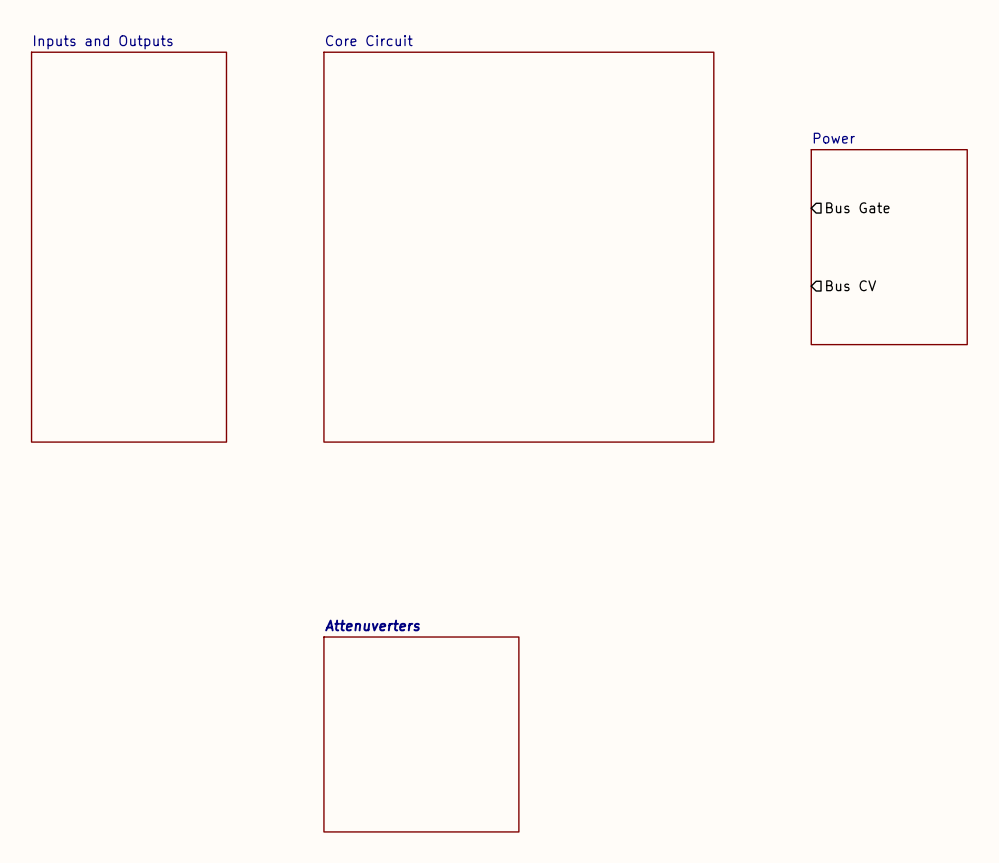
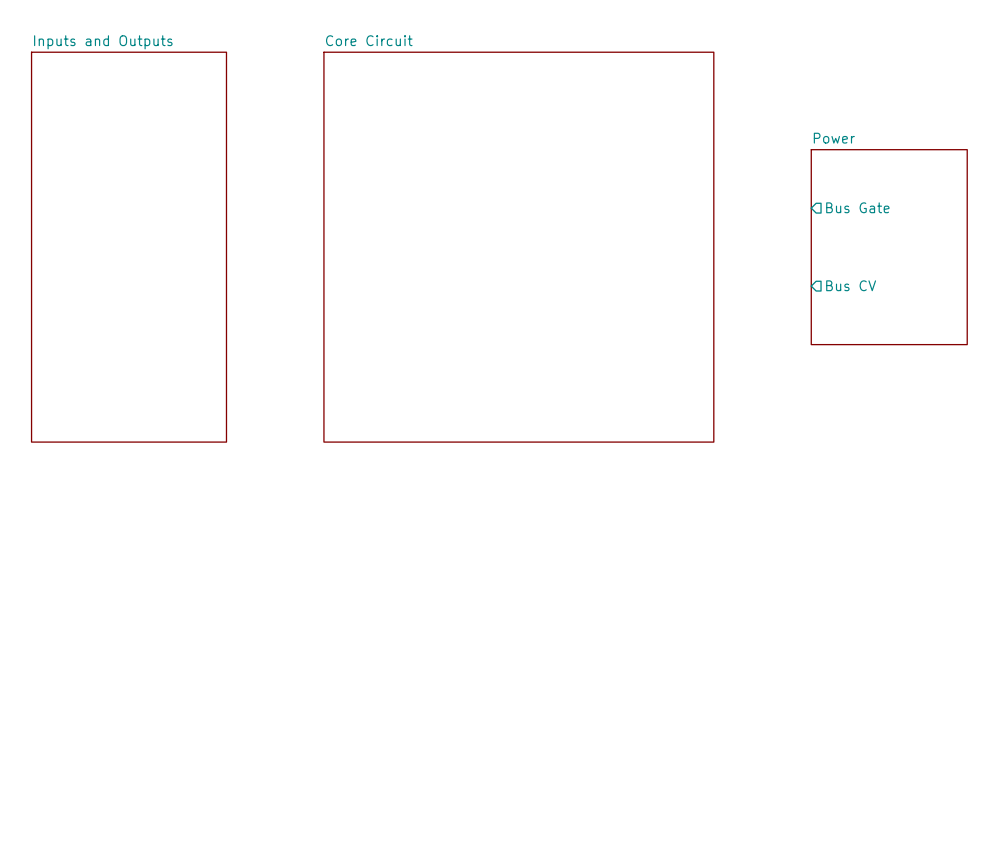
sheet Attenuverters: (421, 734) -> none

